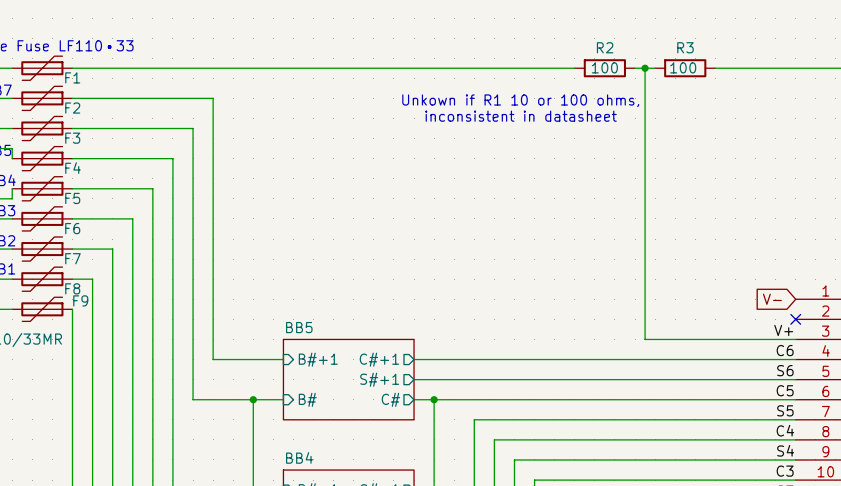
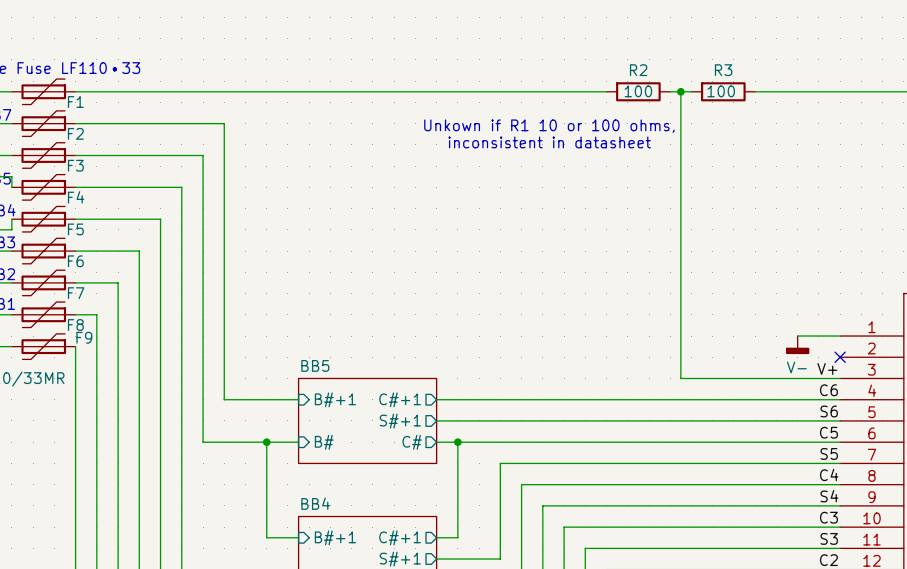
wire: none -> (797, 336) (840, 336)
global label: V- (772, 299) -> none
power symbol: none -> V- (797, 345)

